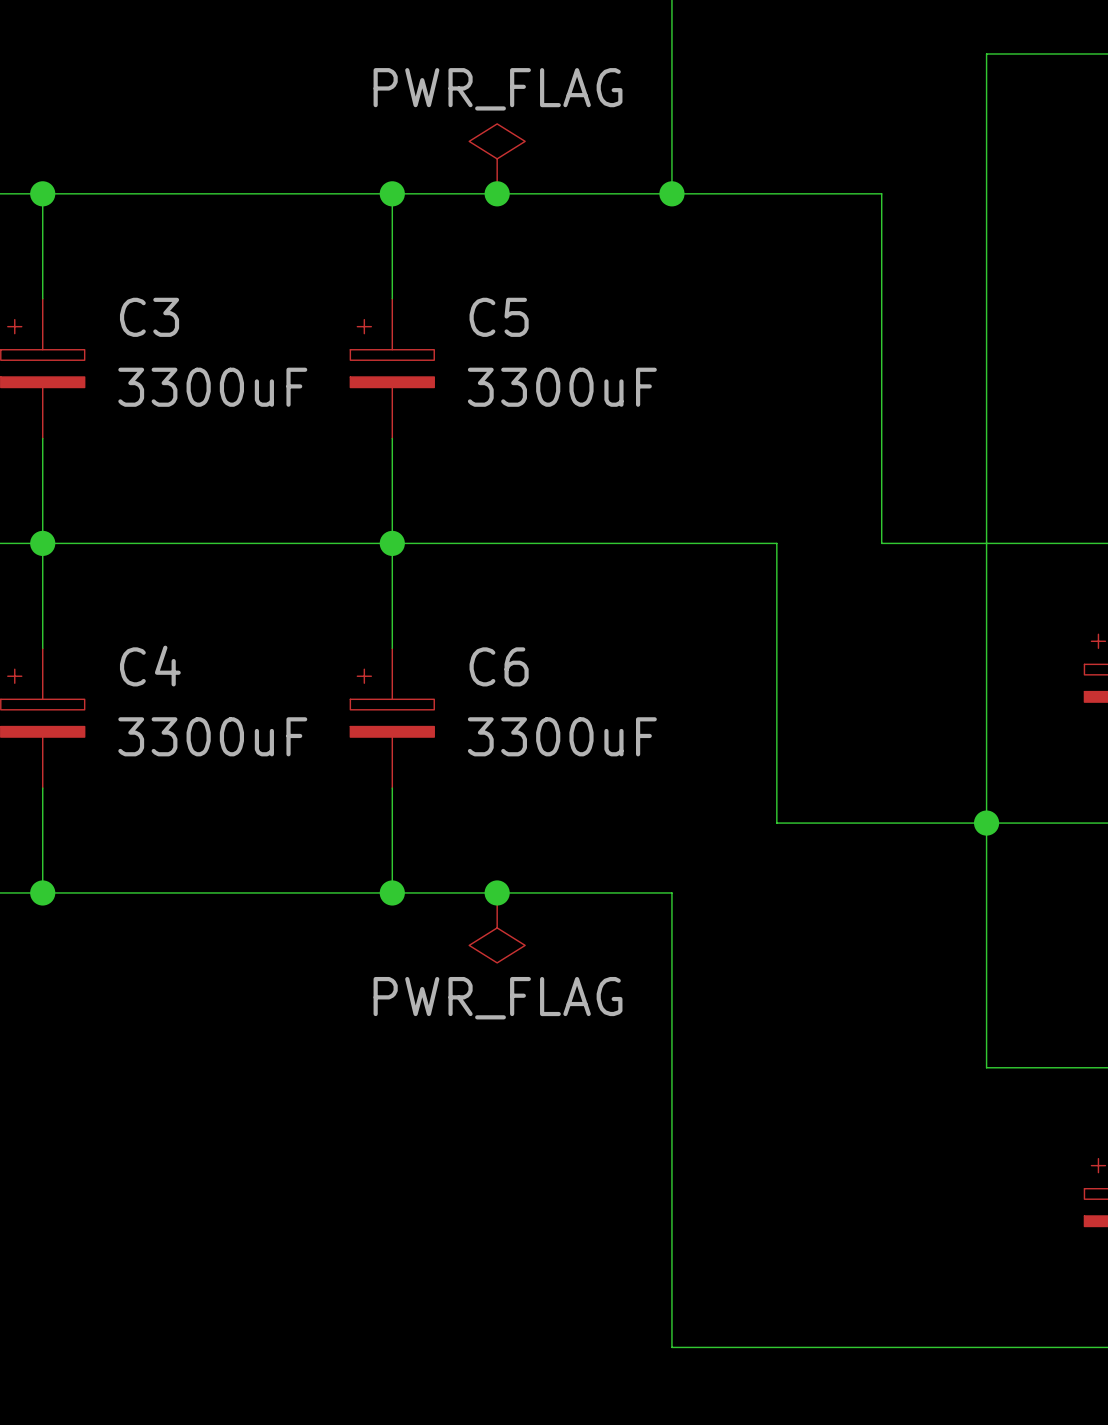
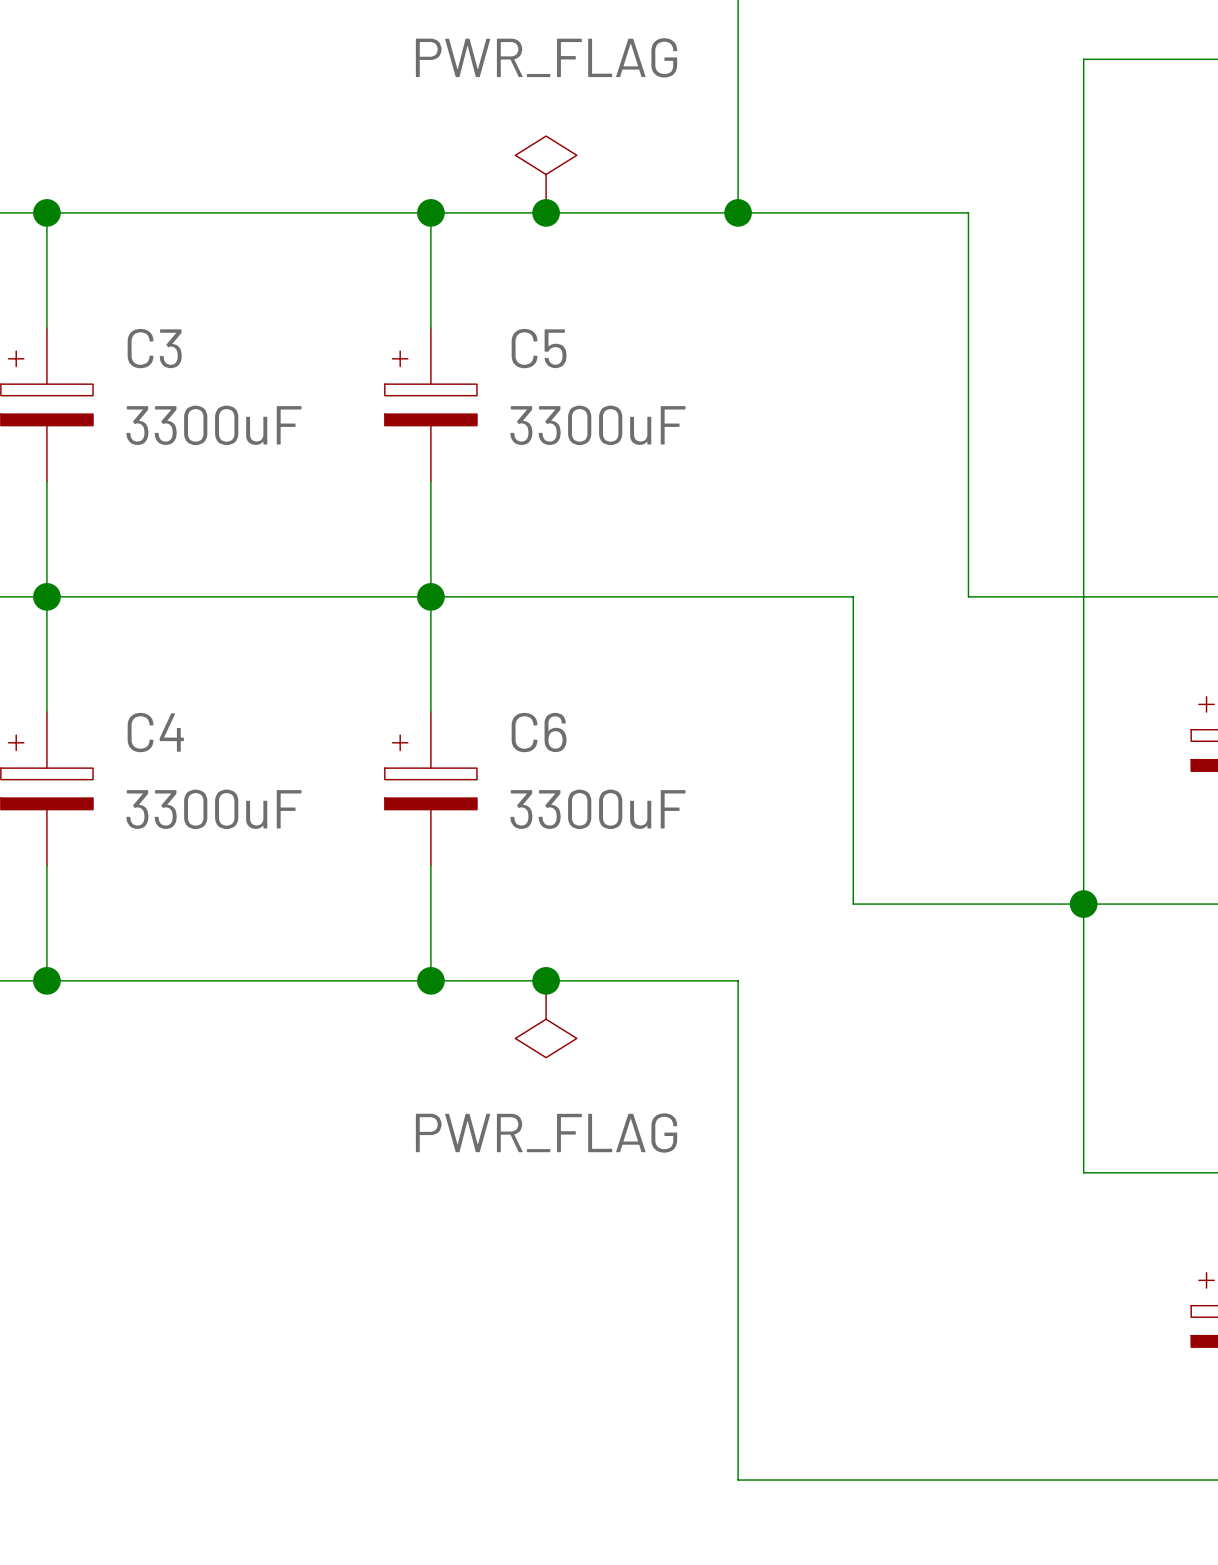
power symbol text position: PWR_FLAG (498, 89) -> PWR_FLAG (546, 57)
power symbol text position: PWR_FLAG (498, 998) -> PWR_FLAG (546, 1133)

